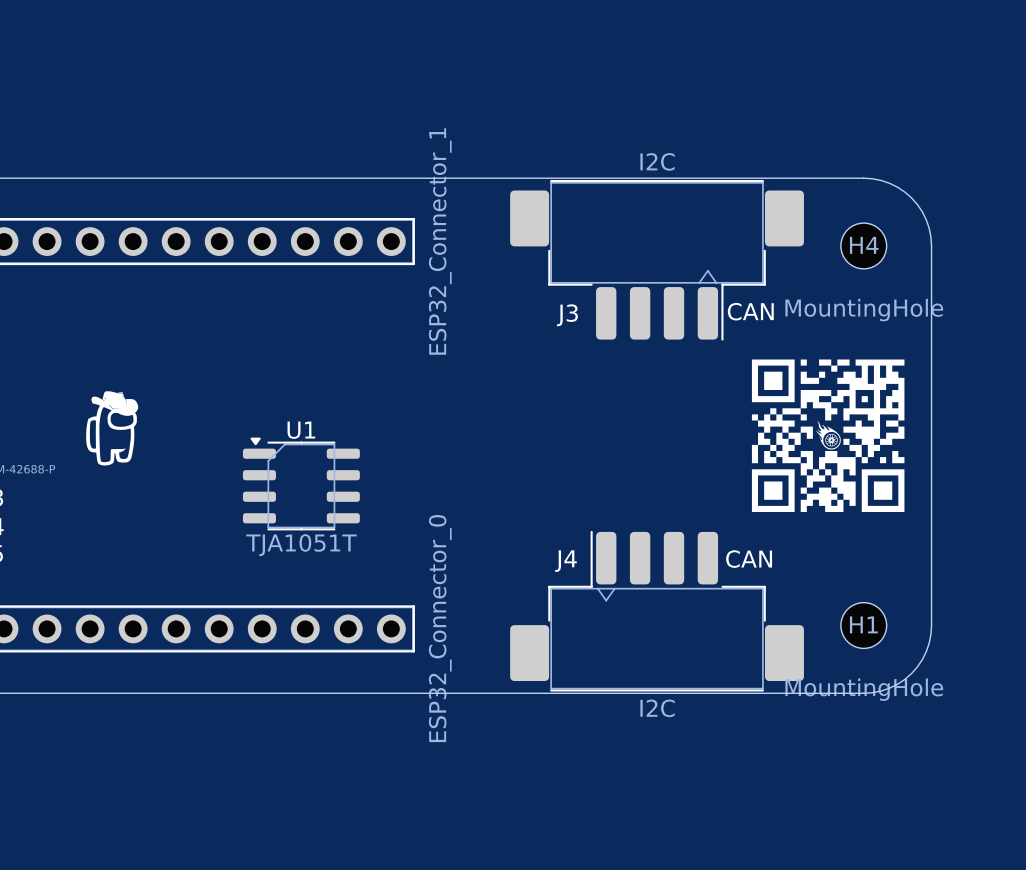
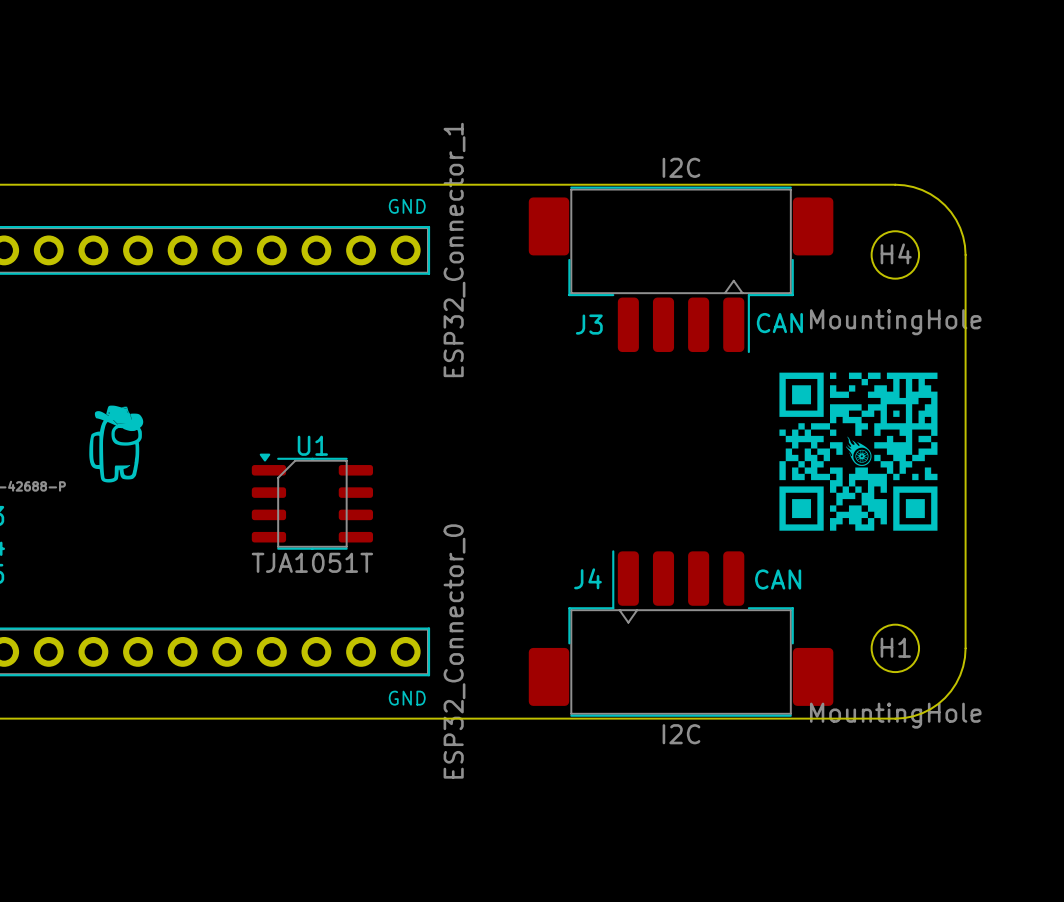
text: none -> GND (407, 206)
text: none -> GND (407, 698)

